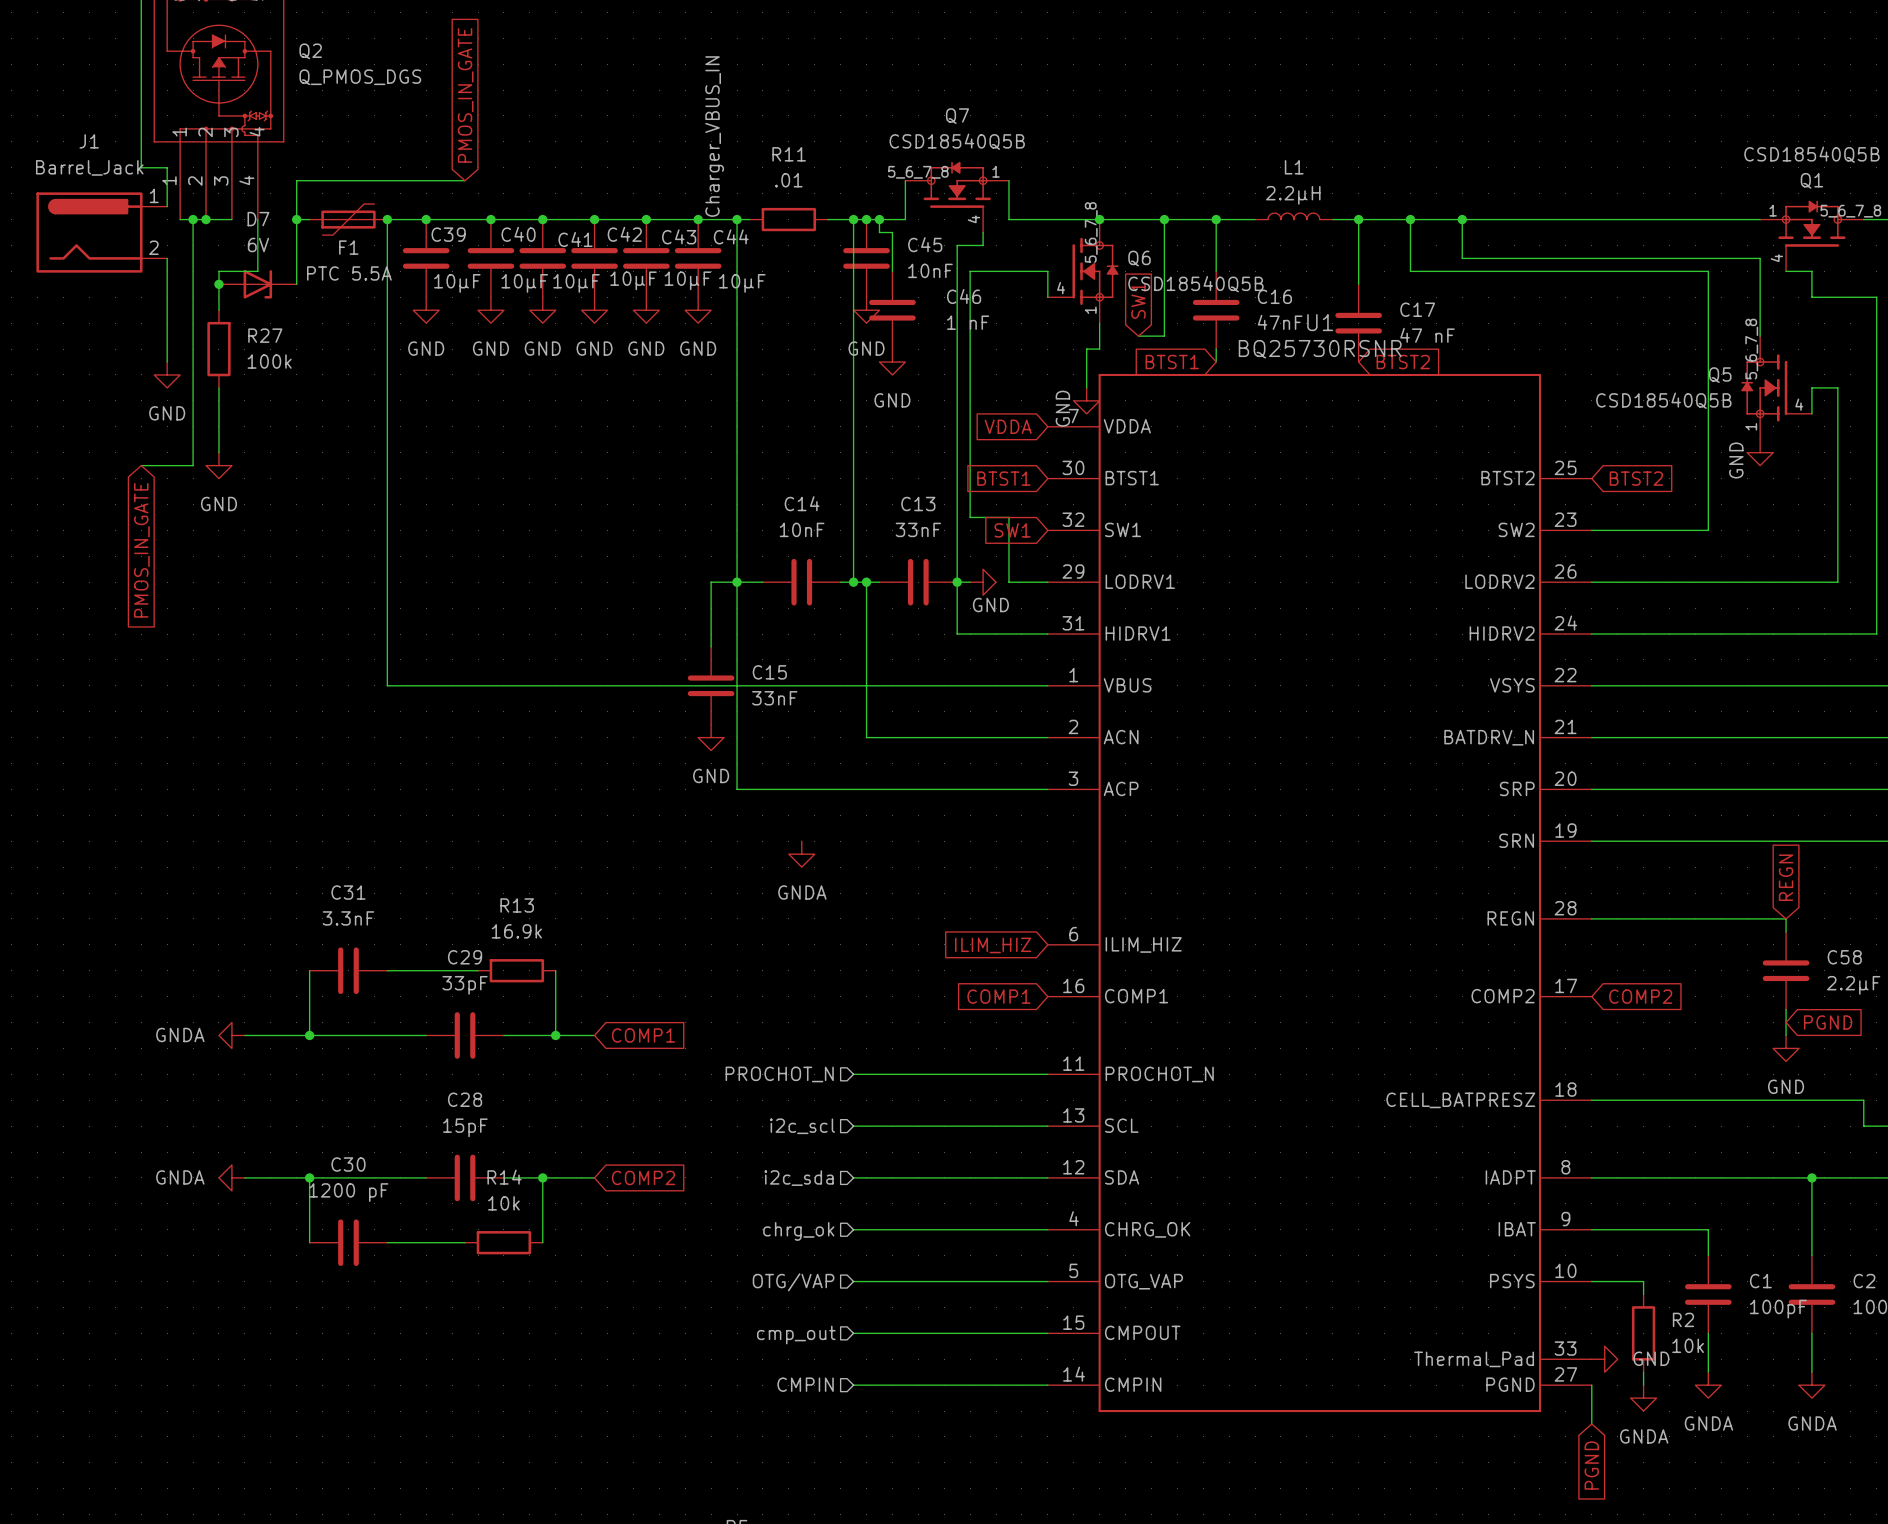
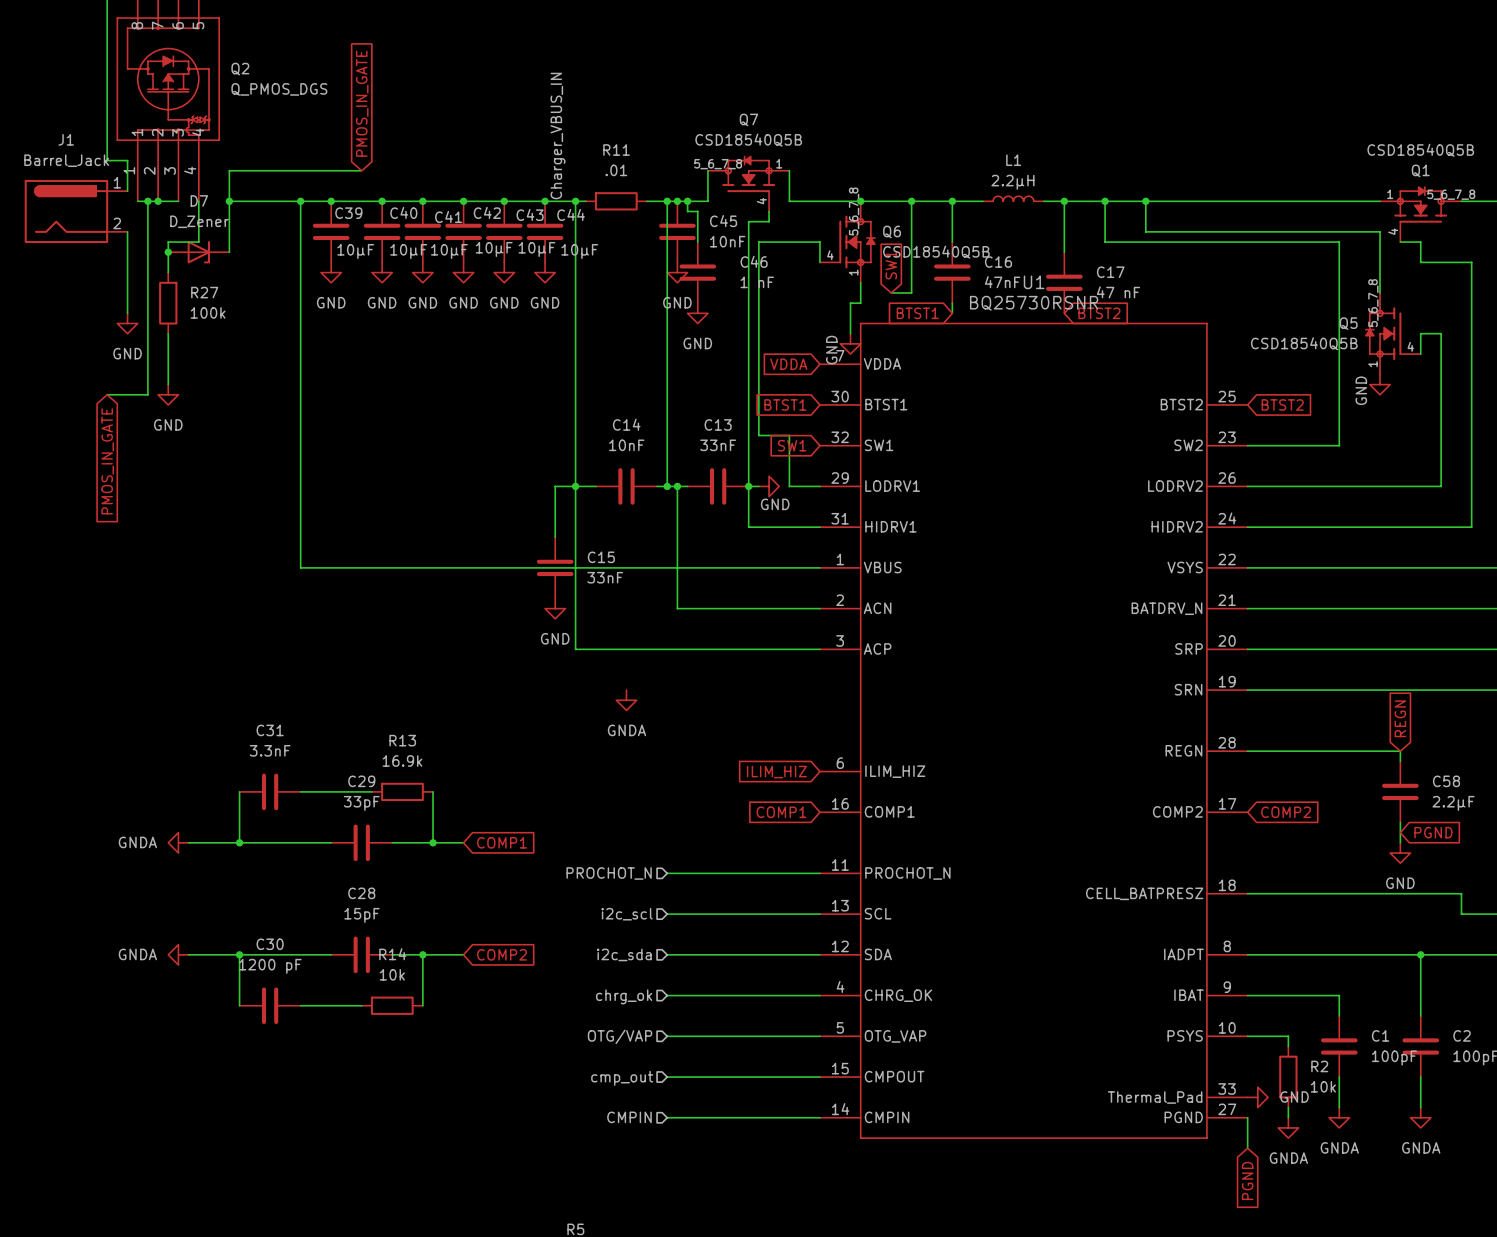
F1: PTC 5.5A (348, 219) -> none
D7 value: 6V (258, 244) -> D_Zener (199, 221)

